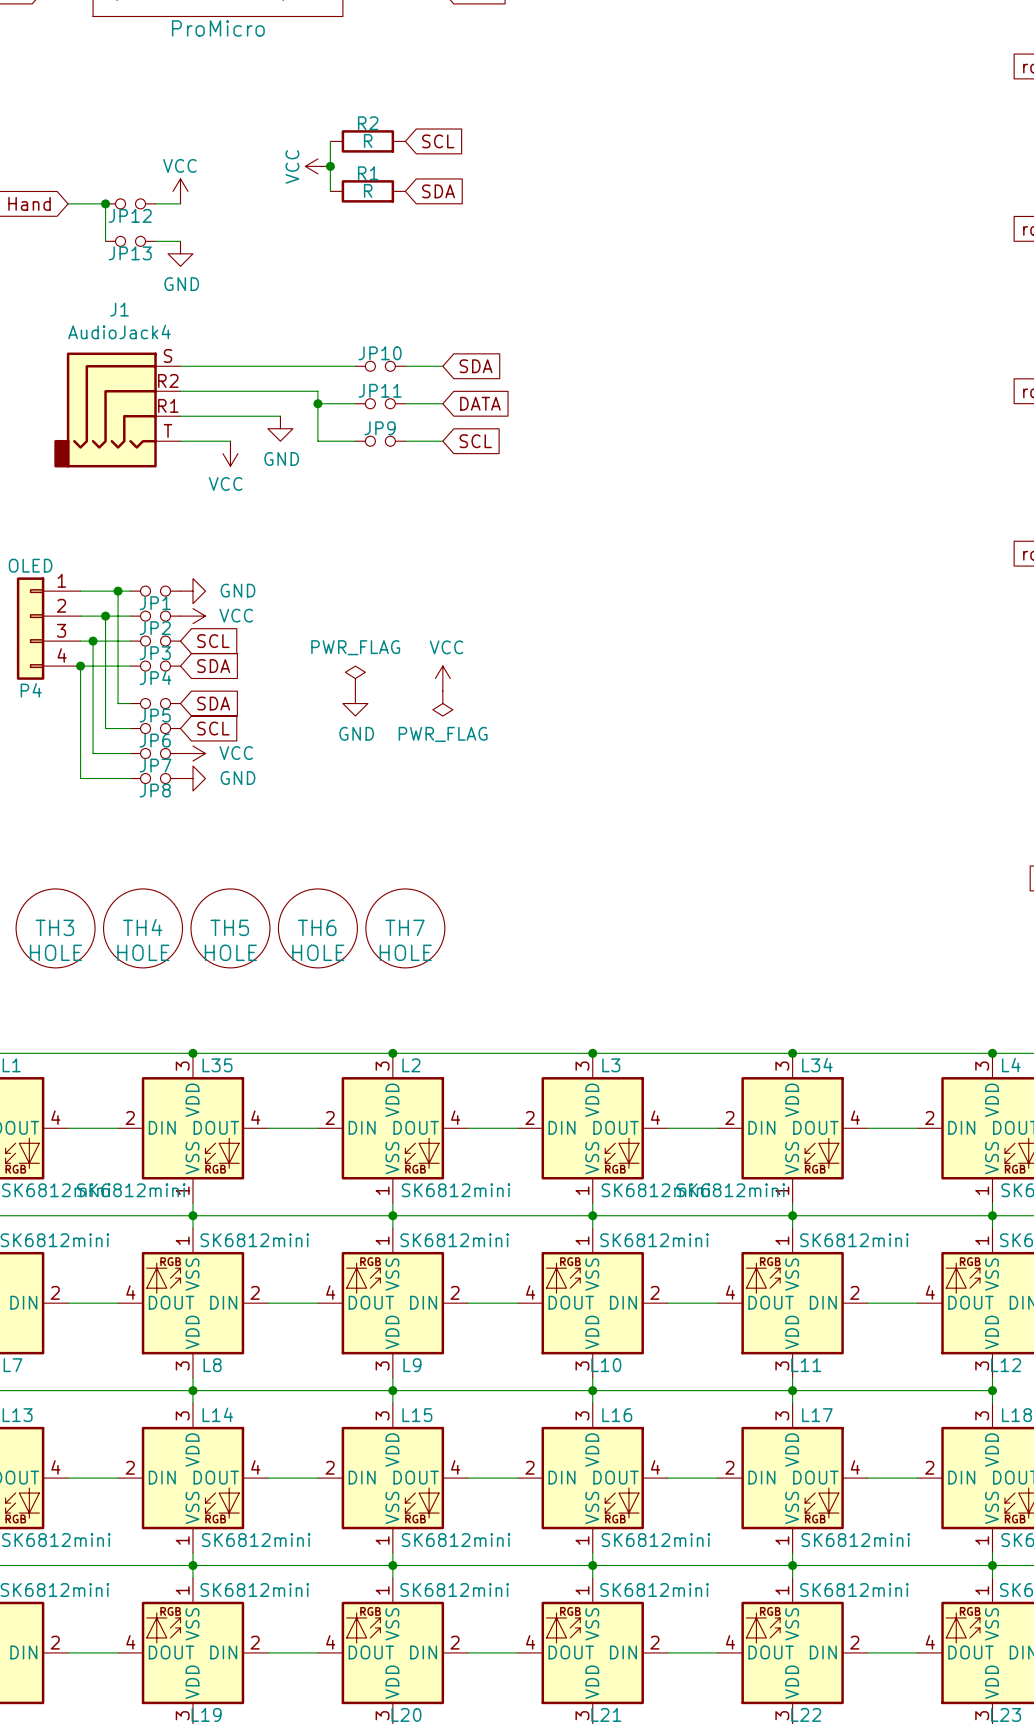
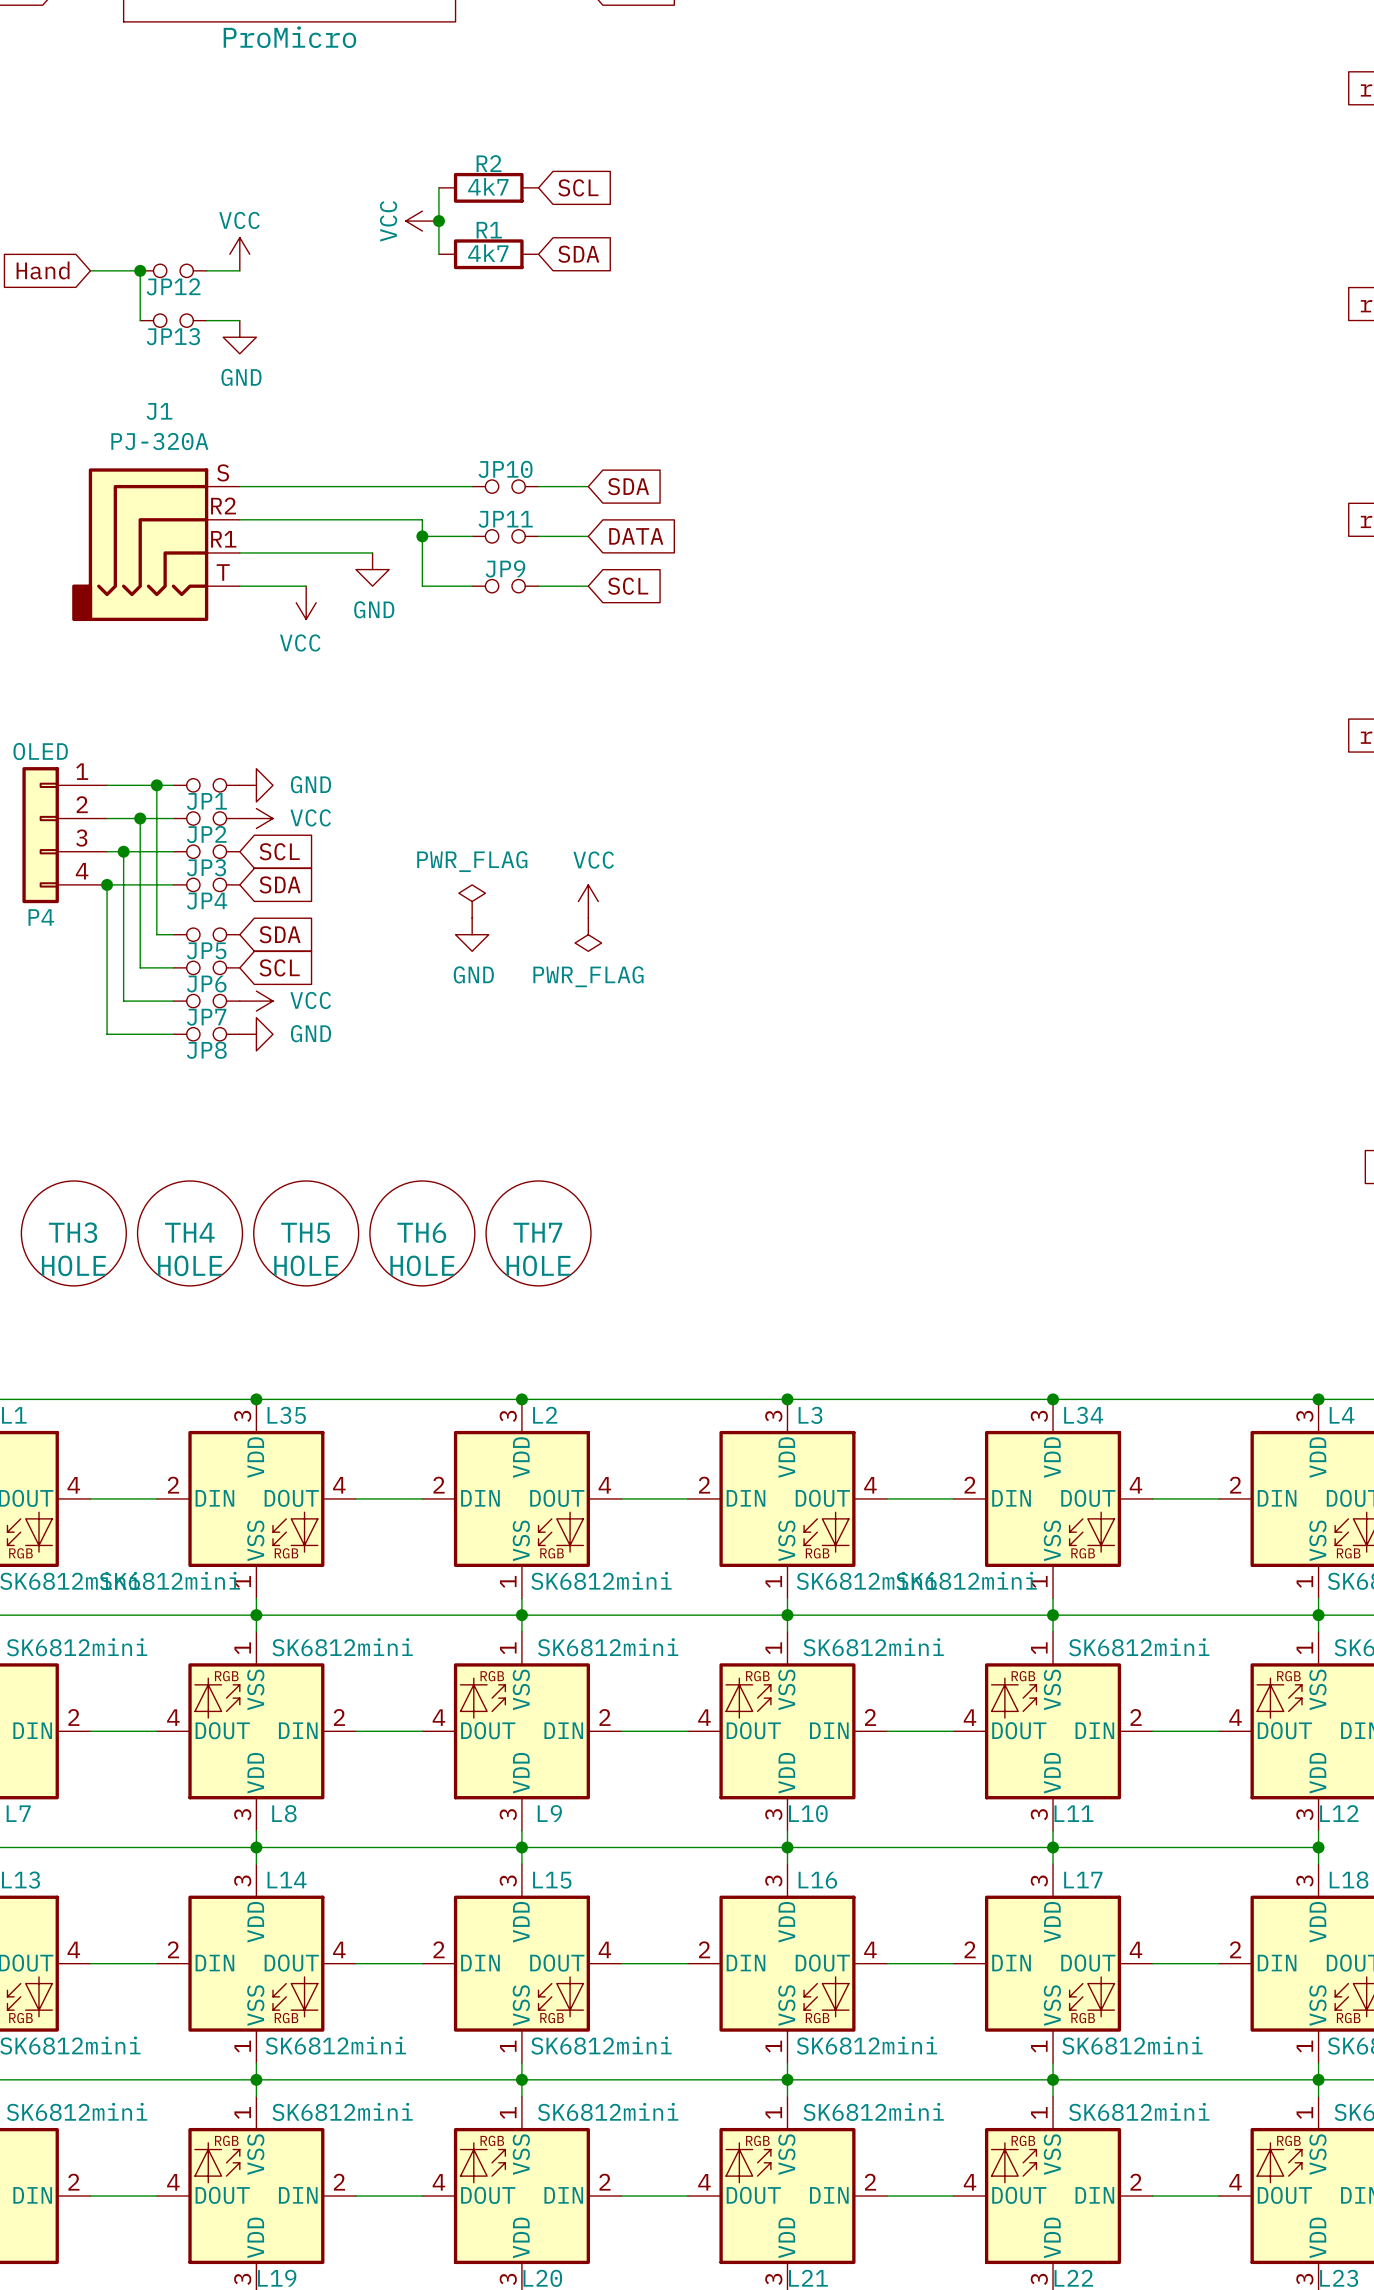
R2 value: R (368, 140) -> 4k7 (488, 186)
R1 value: R (368, 190) -> 4k7 (488, 253)
J1 value: AudioJack4 (119, 332) -> PJ-320A (159, 441)

